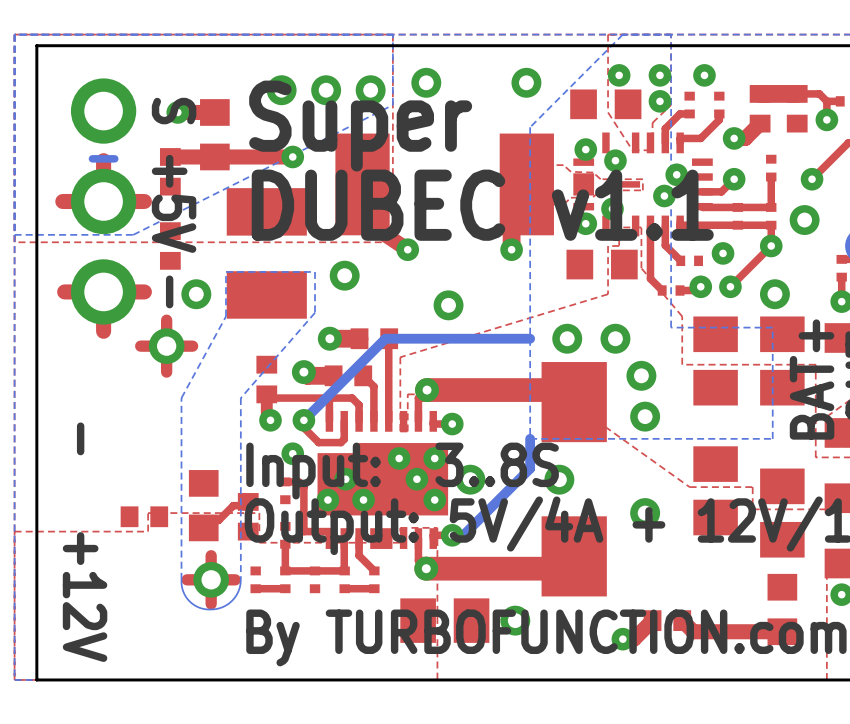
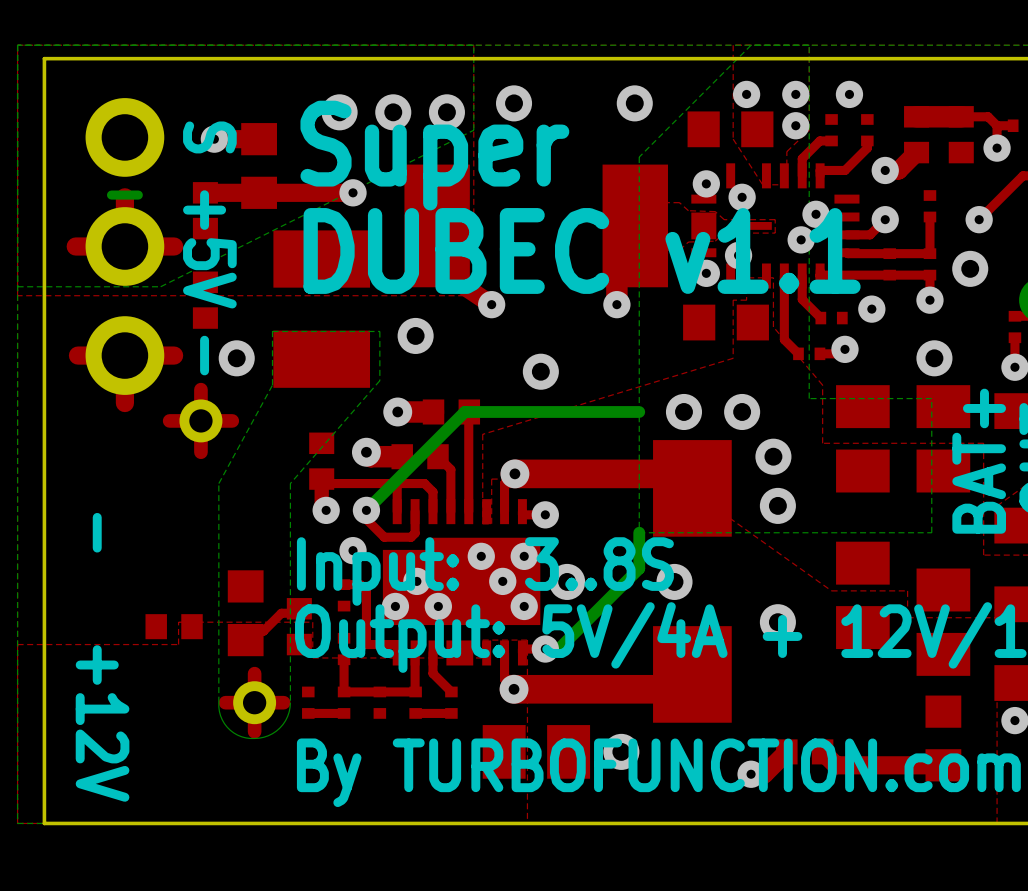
top track: (771, 246) (730, 286) -> none
via: (730, 286) -> none

